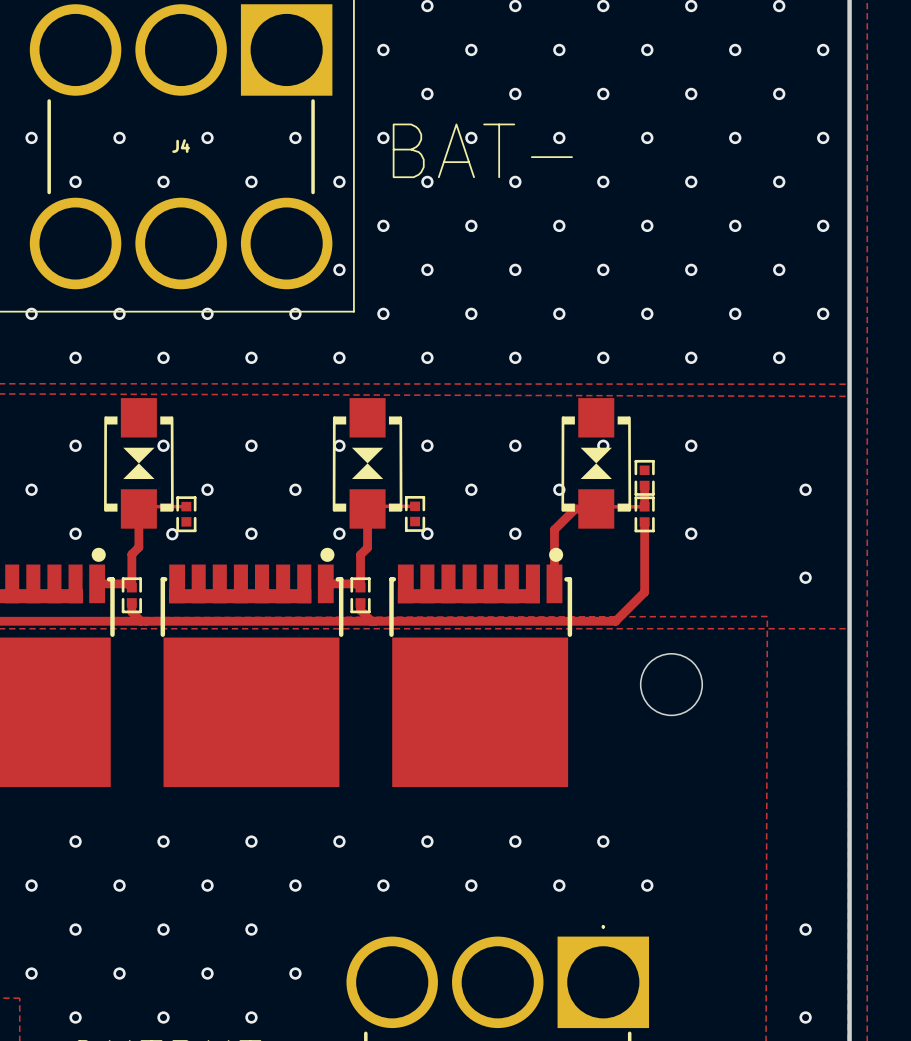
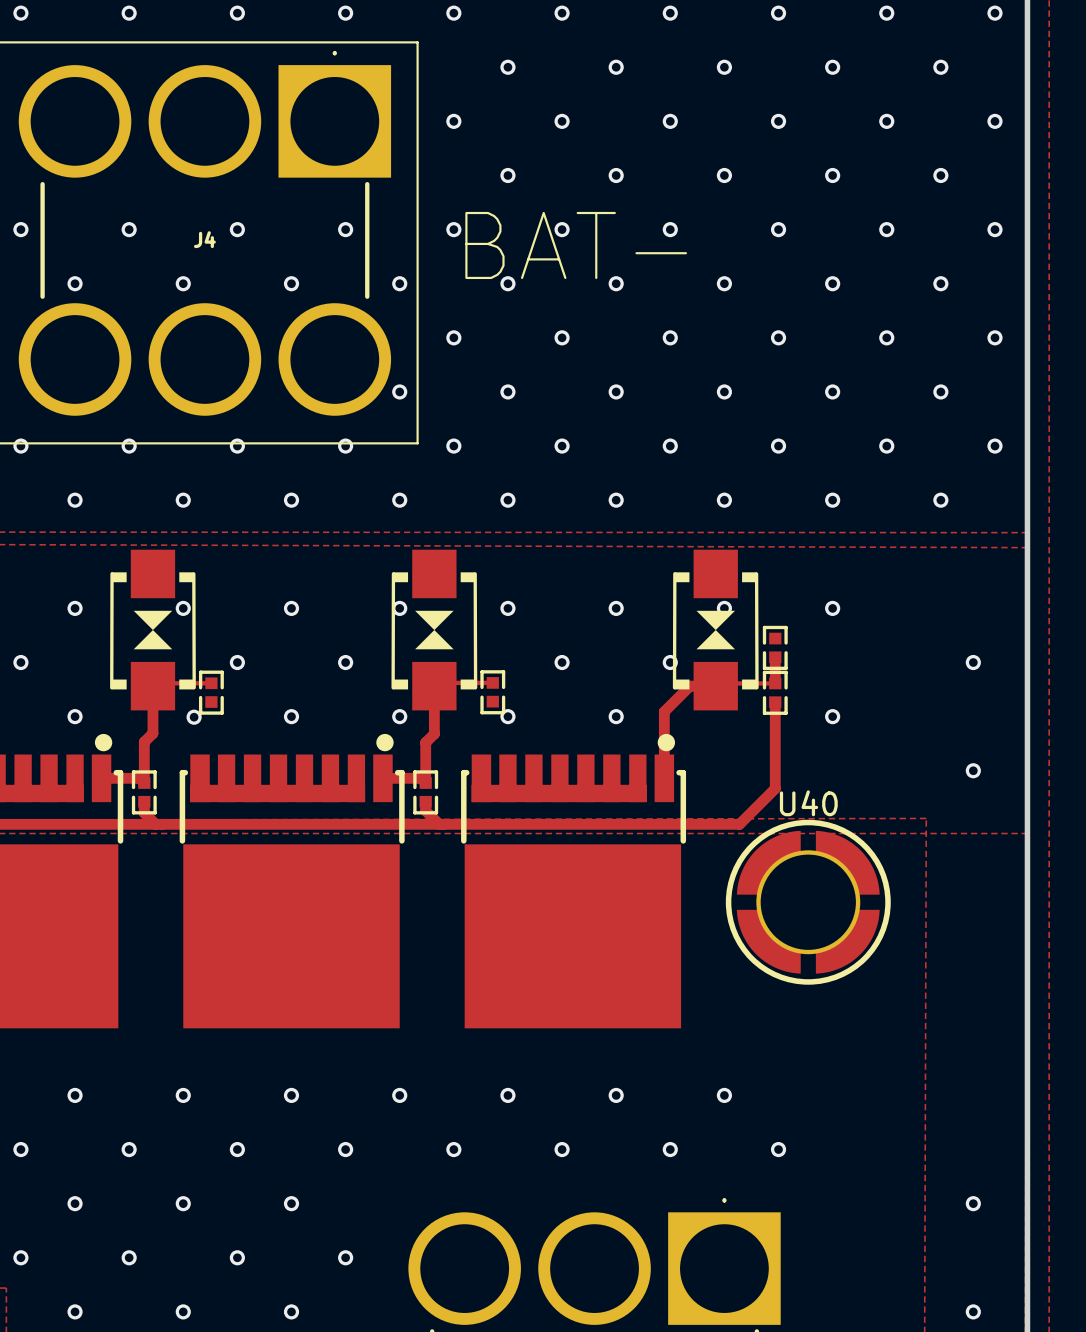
round board edge: [640, 653, 703, 716] -> none
U40: none -> (808, 902)

